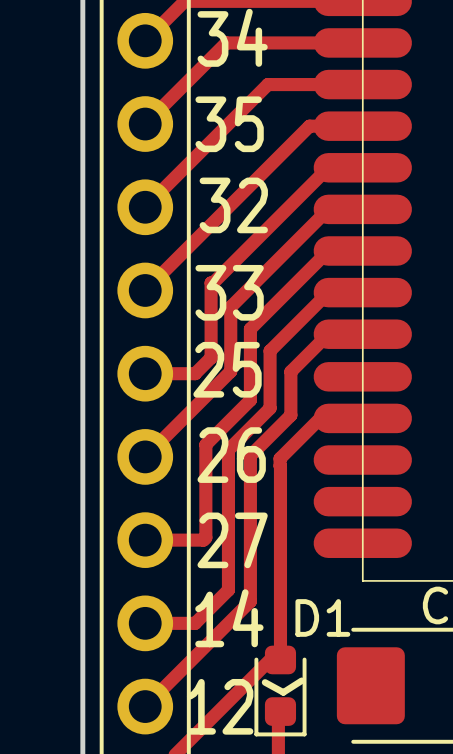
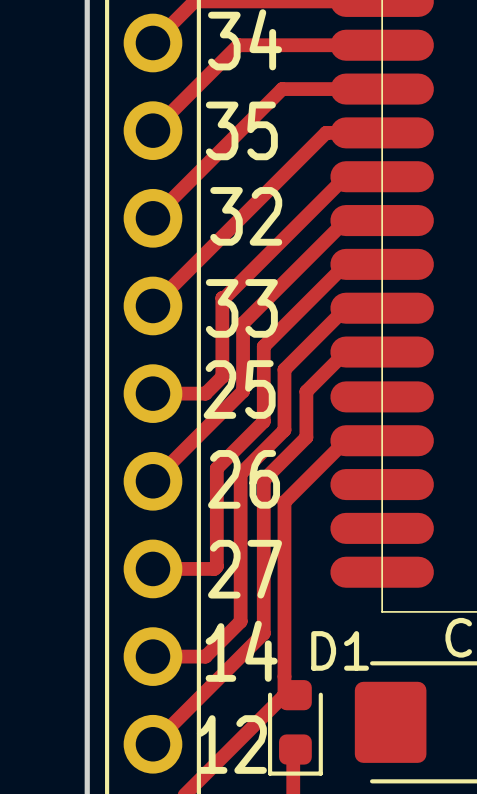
track: (328, 418) (320, 418) (280, 458) (280, 465) -> (345, 440) (284, 502) (284, 695)
track: (280, 466) (280, 659) -> none
line: (301, 680) (283, 692) (265, 682) -> none

